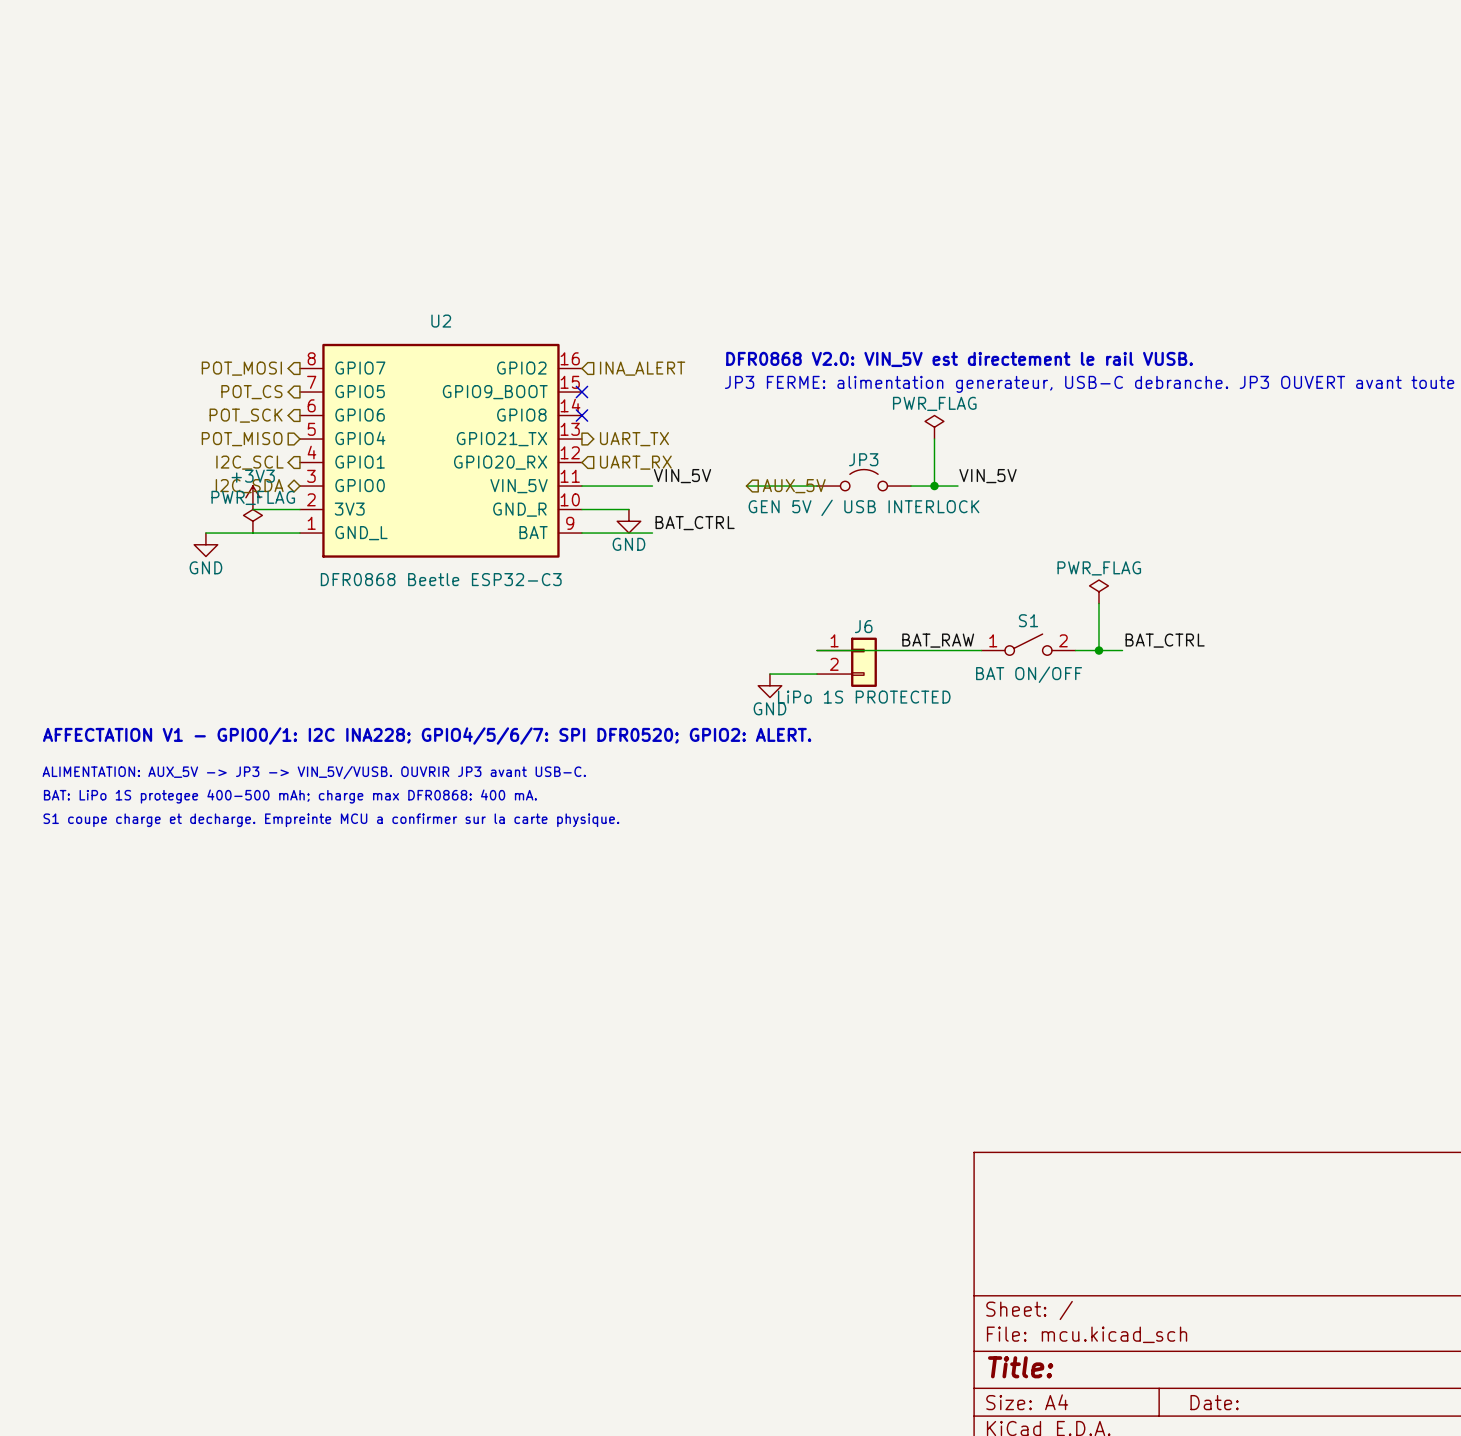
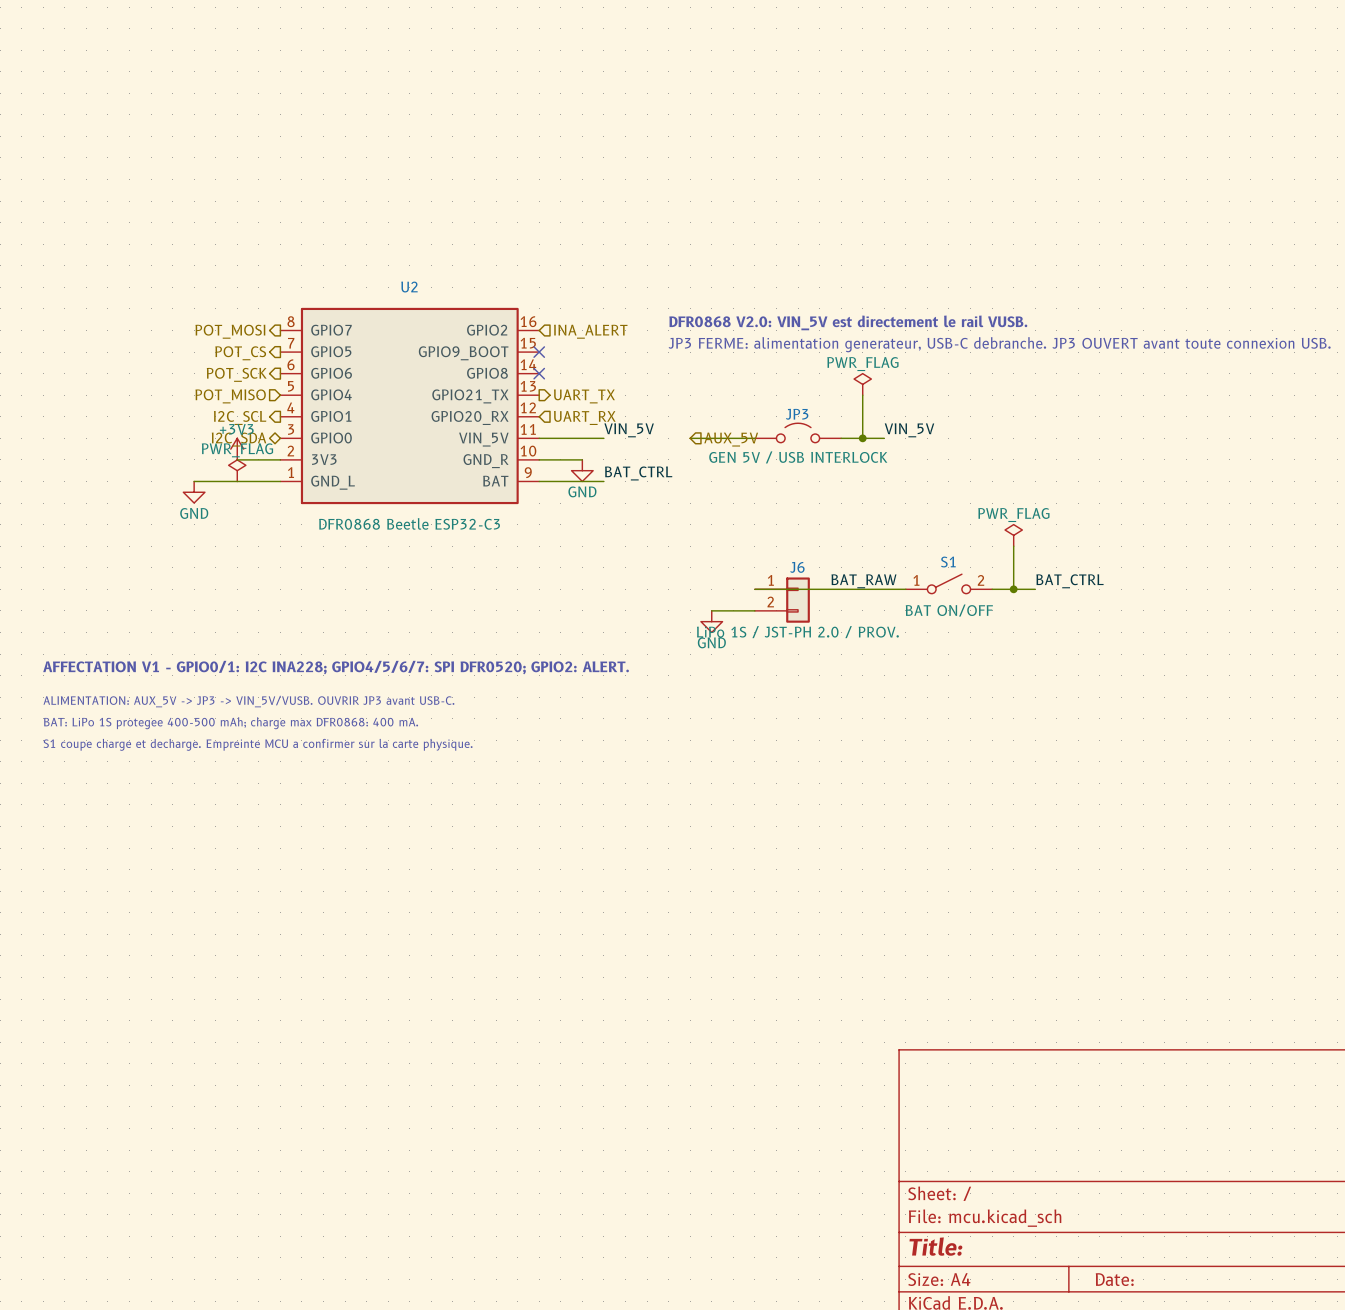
J6 value: LiPo 1S PROTECTED (864, 697) -> LiPo 1S / JST-PH 2.0 / PROV. (797, 632)

